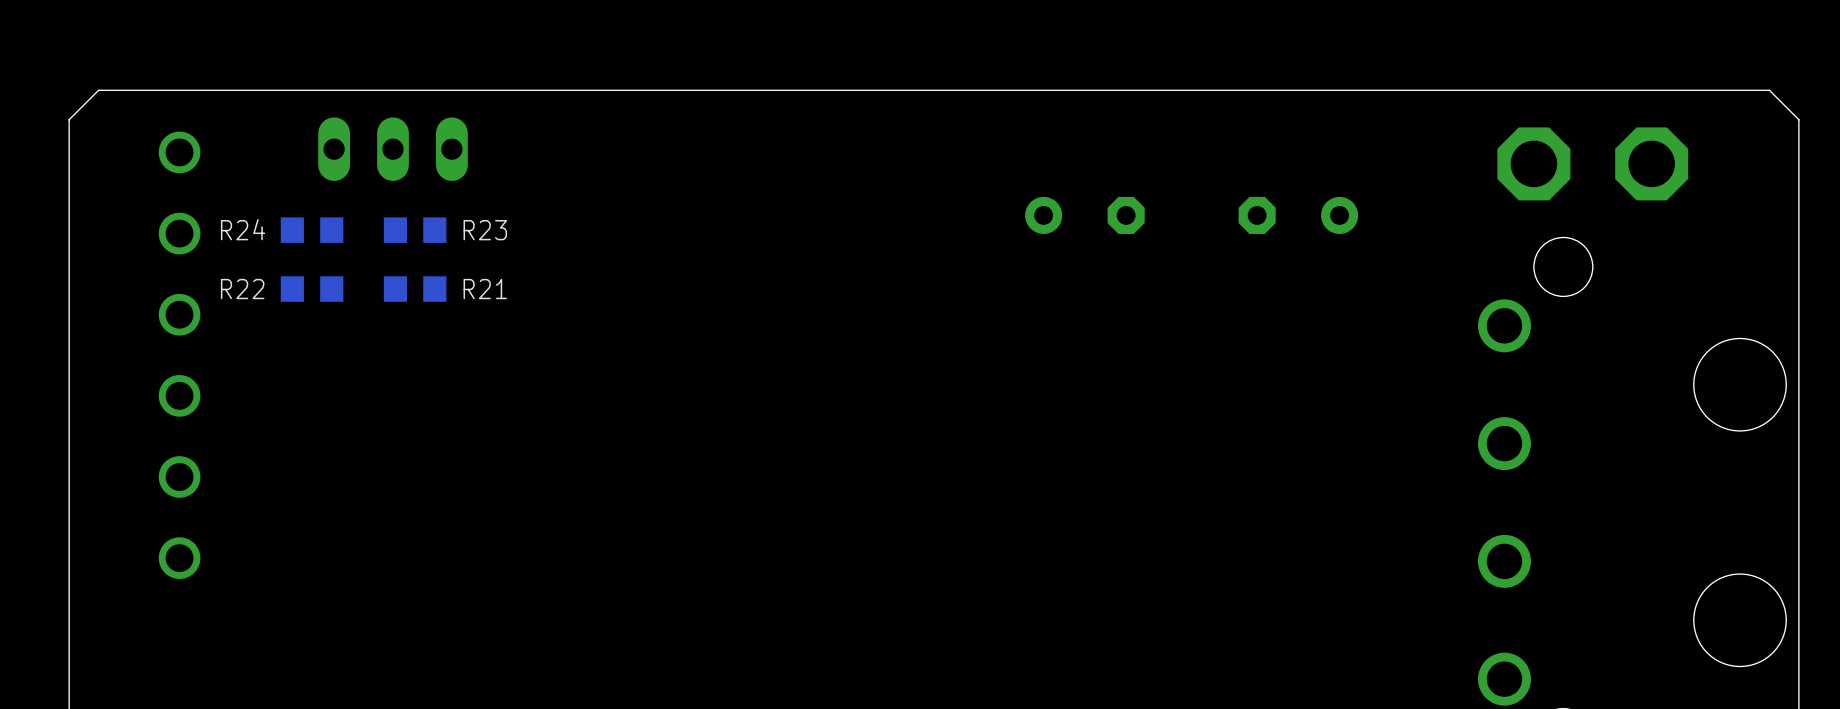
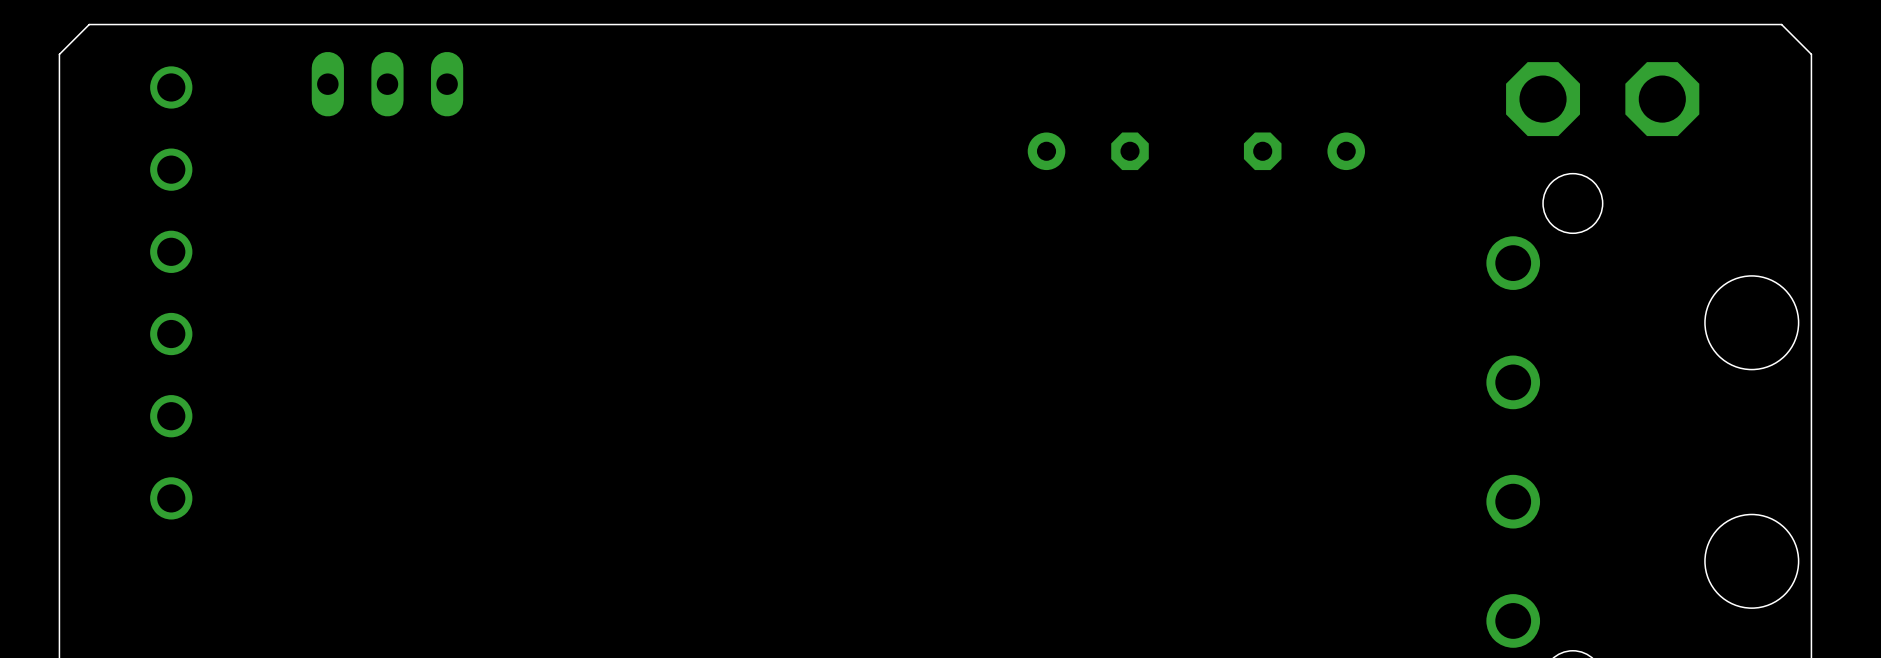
R24: (312, 230) -> none
R23: (415, 230) -> none
R22: (312, 289) -> none
R21: (415, 289) -> none

